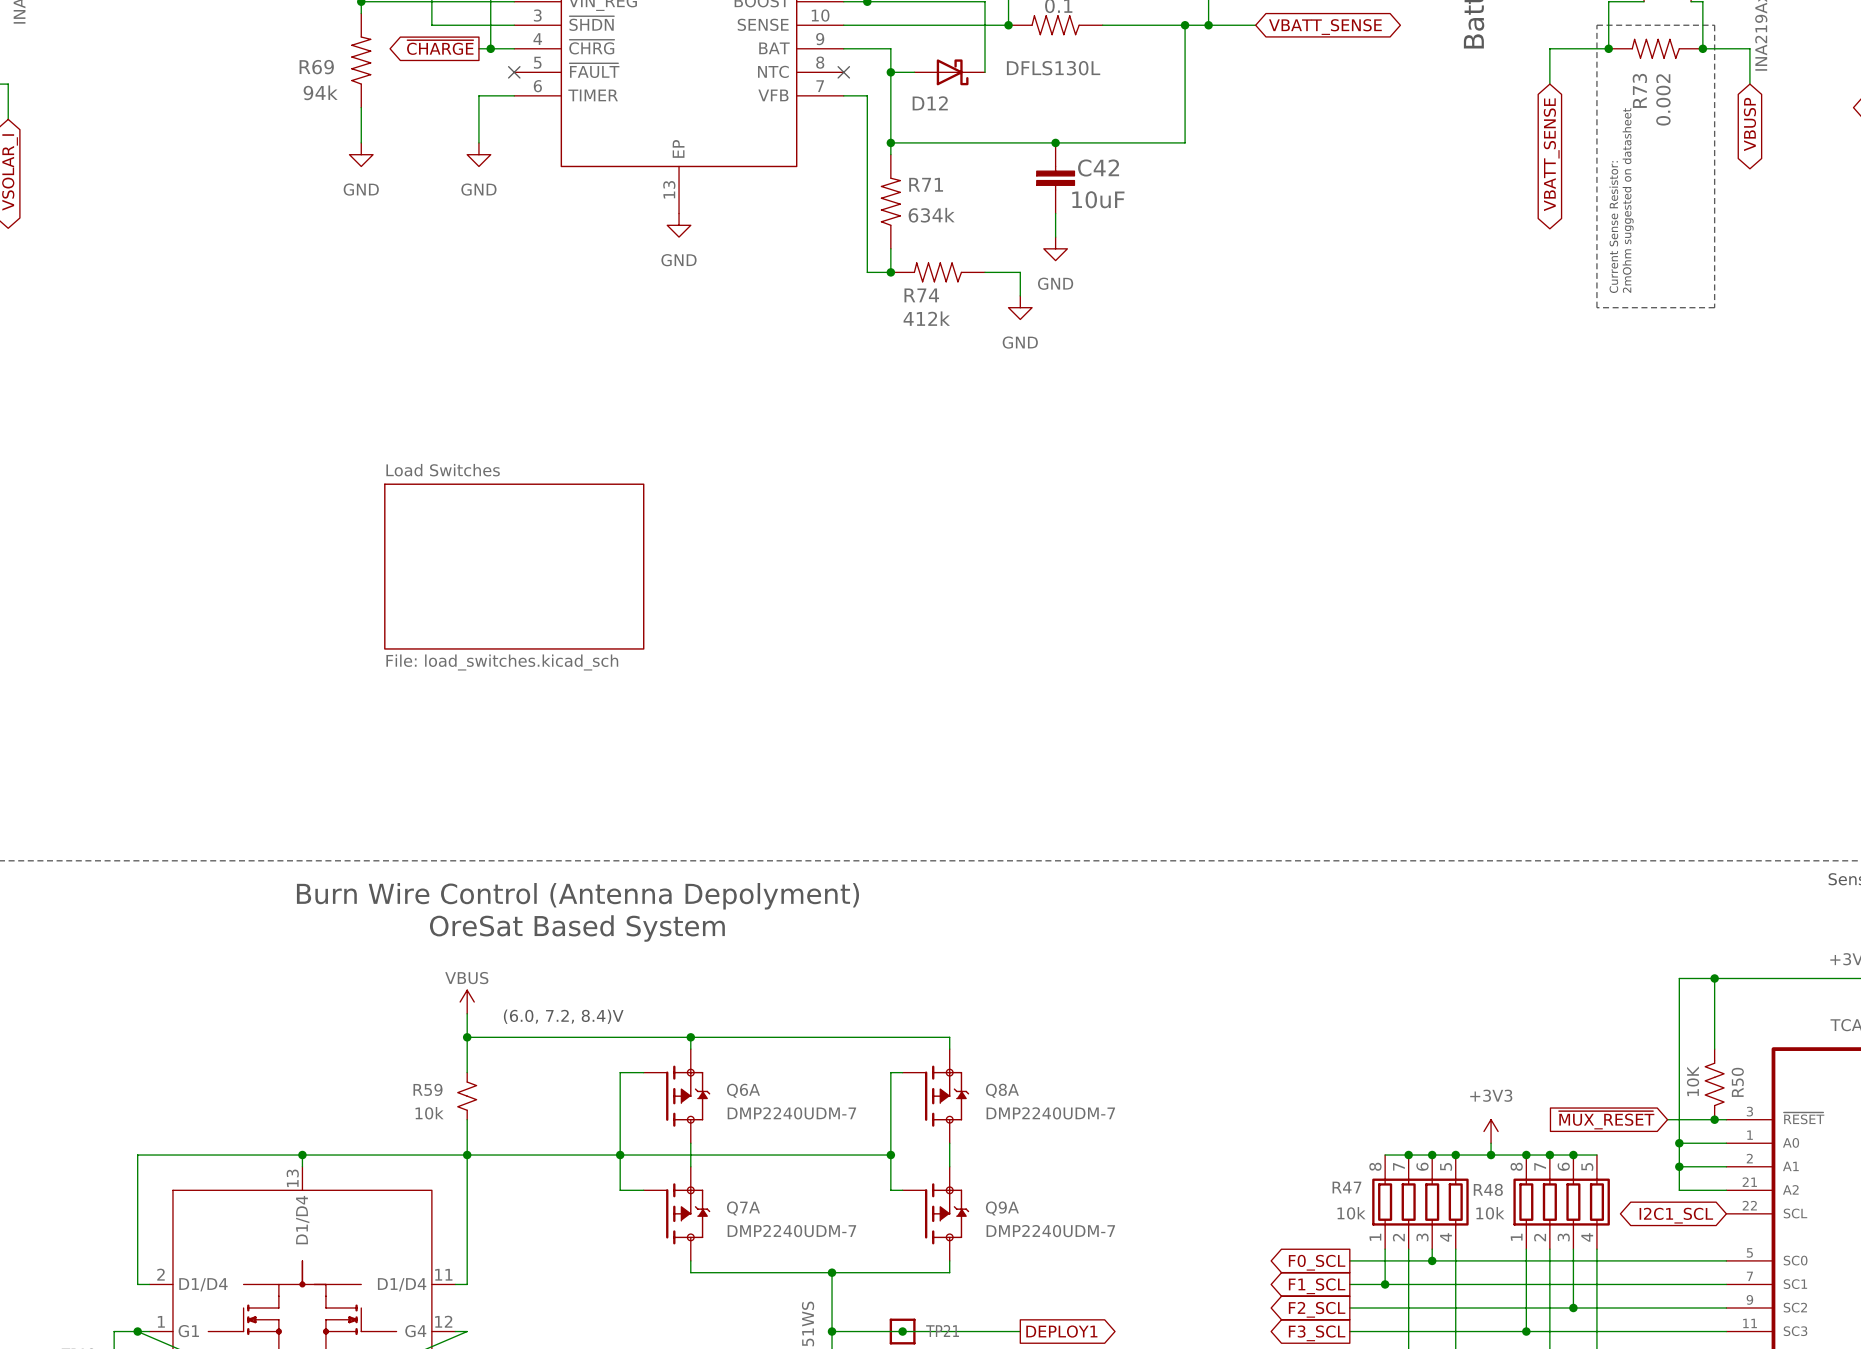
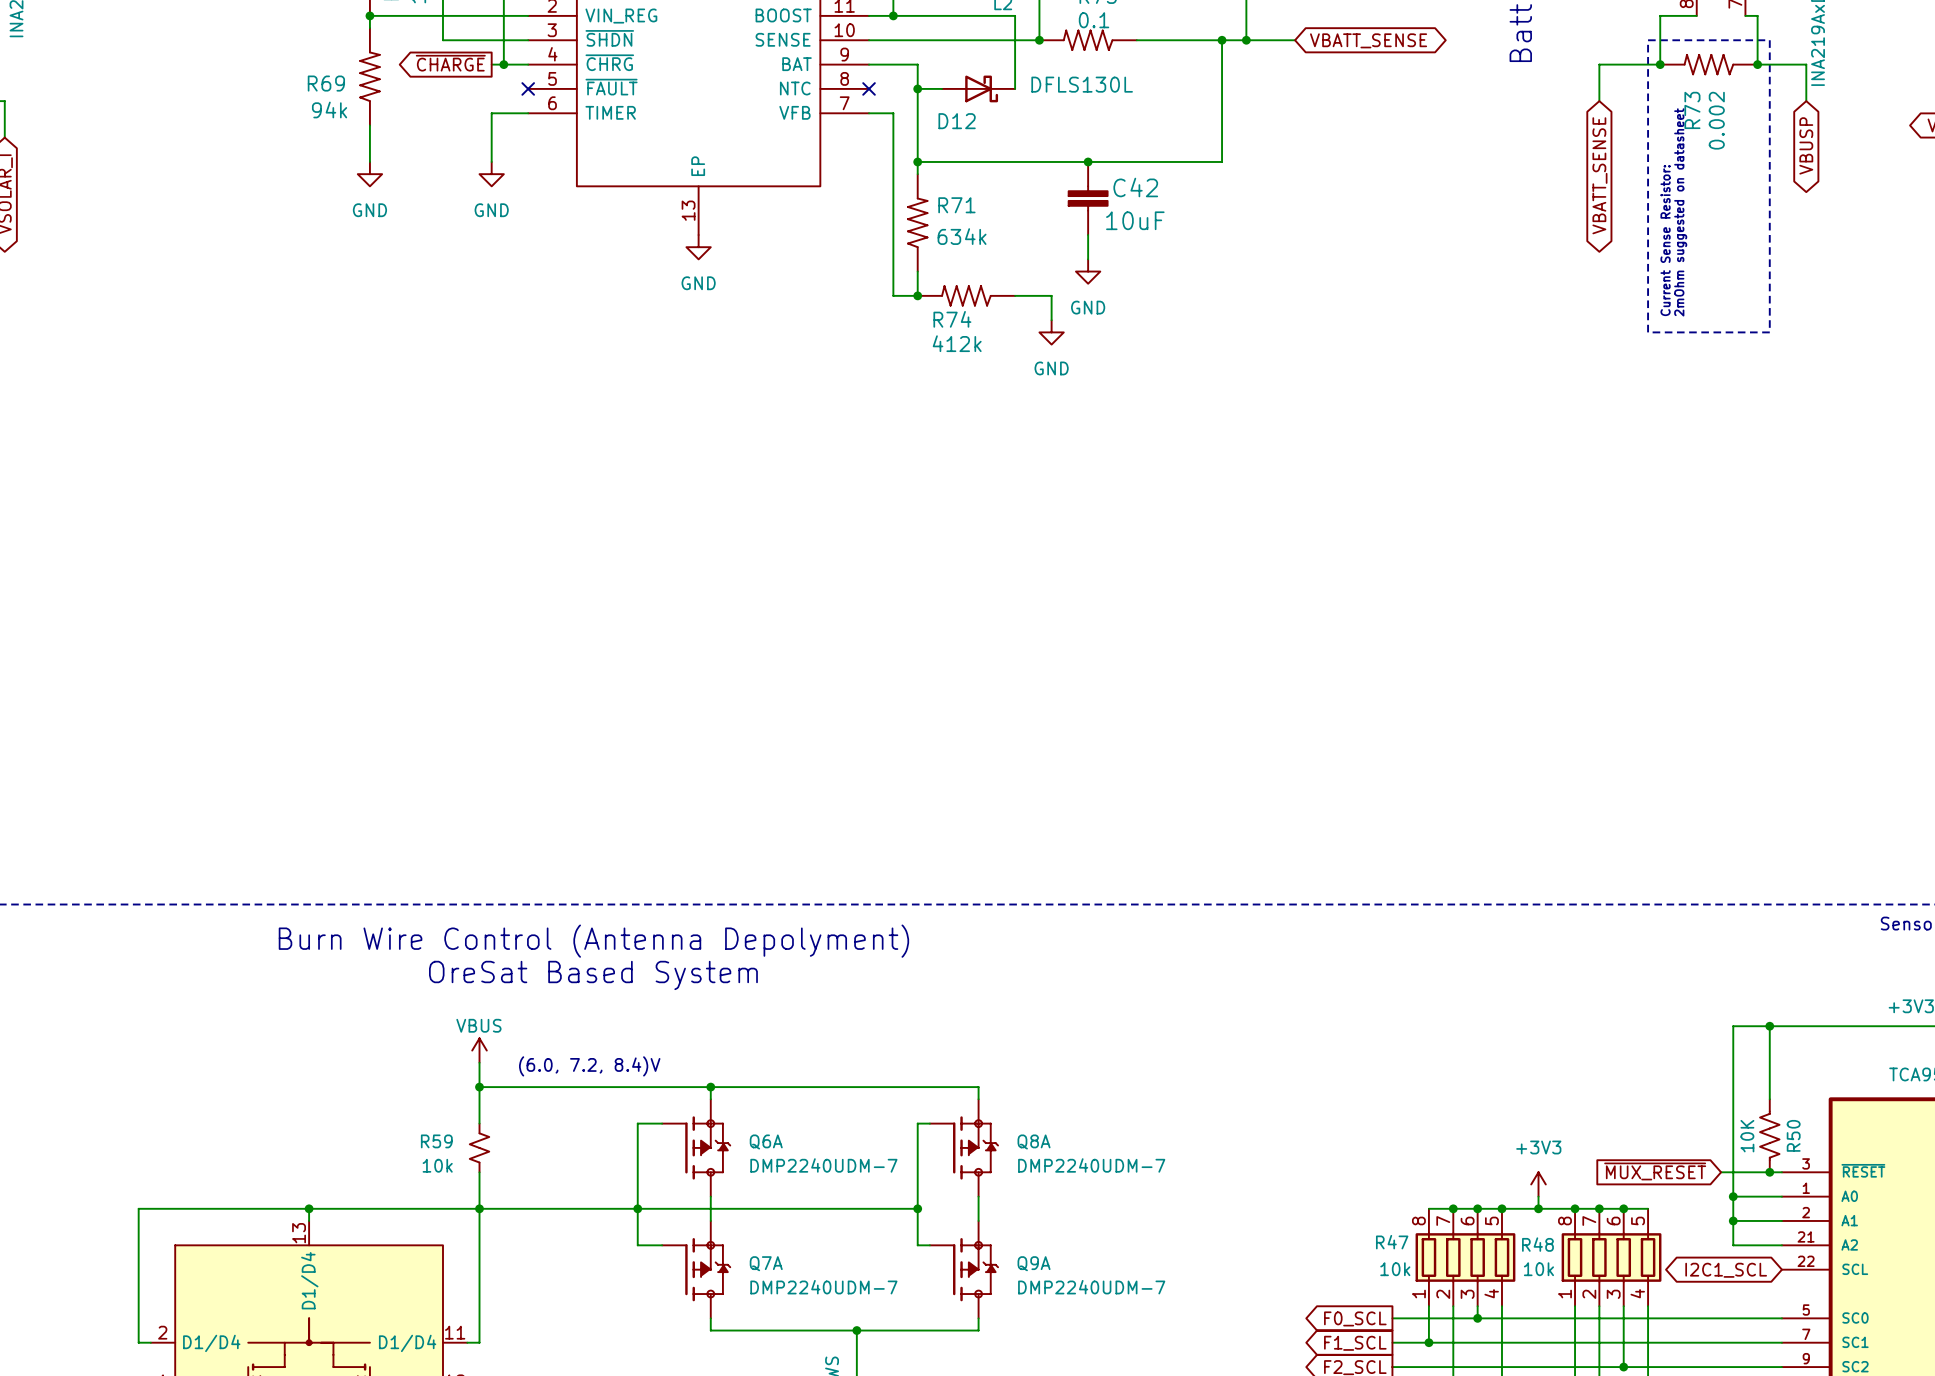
sheet Load Switches: File: load_switches.kicad_sch (514, 566) -> none

